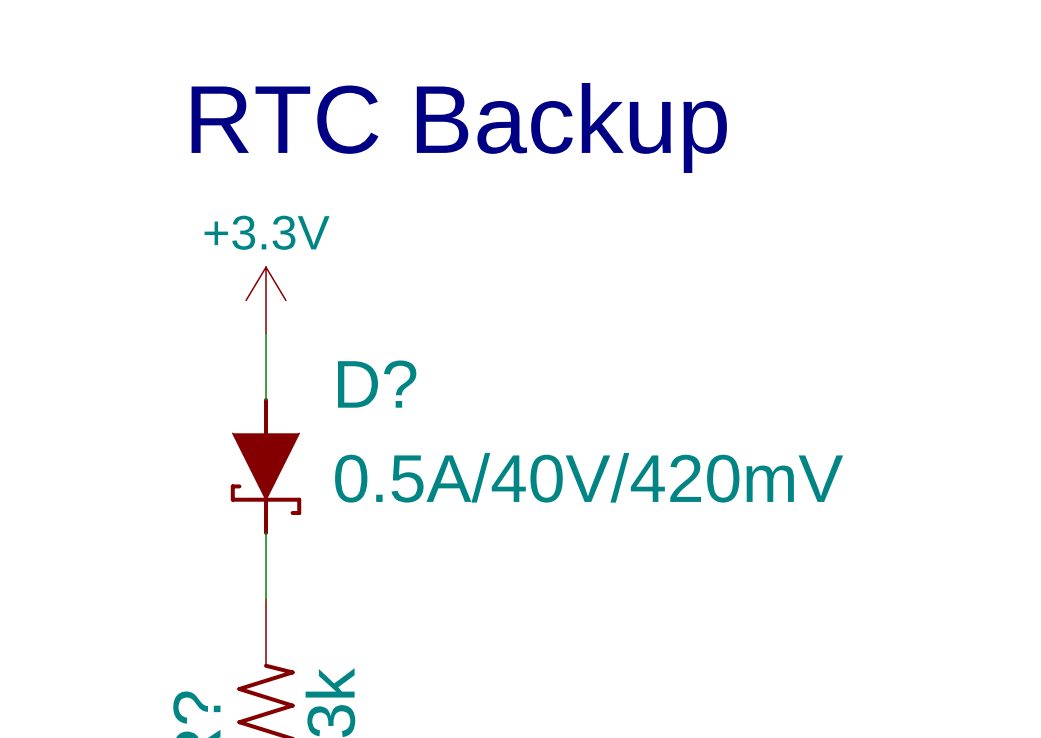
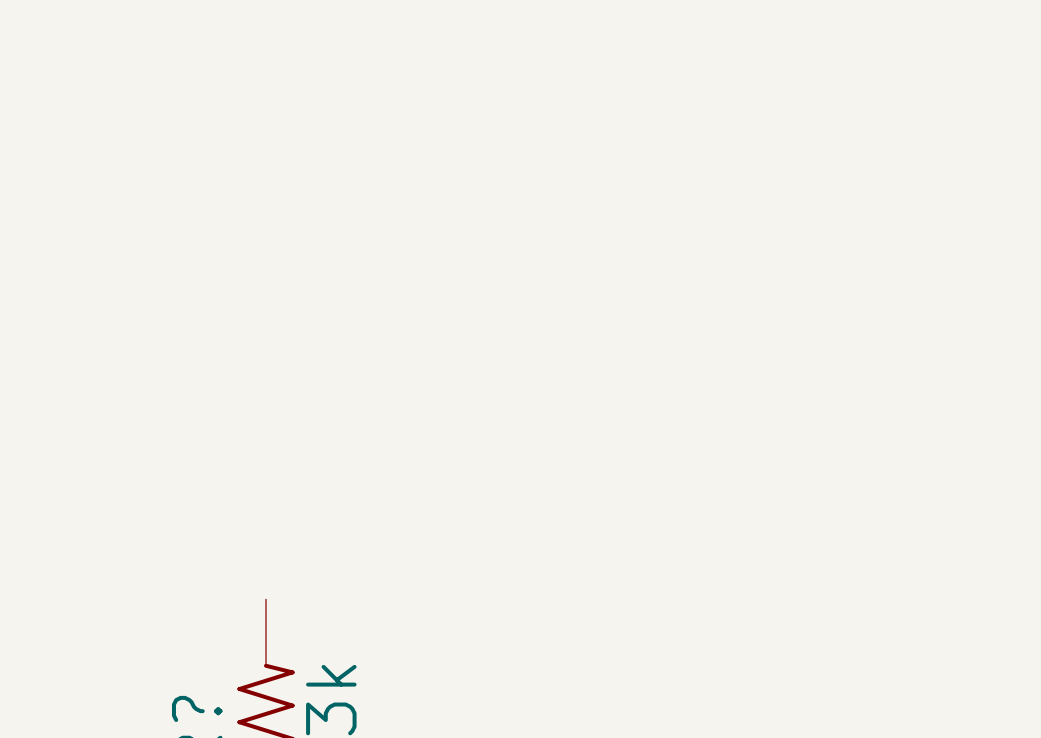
text: RTC Backup (459, 127) -> none
power symbol: +3.3V (266, 300) -> none
wire: (266, 333) (266, 400) -> none
D?: 0.5A/40V/420mV (266, 466) -> none
wire: (266, 532) (266, 599) -> none

